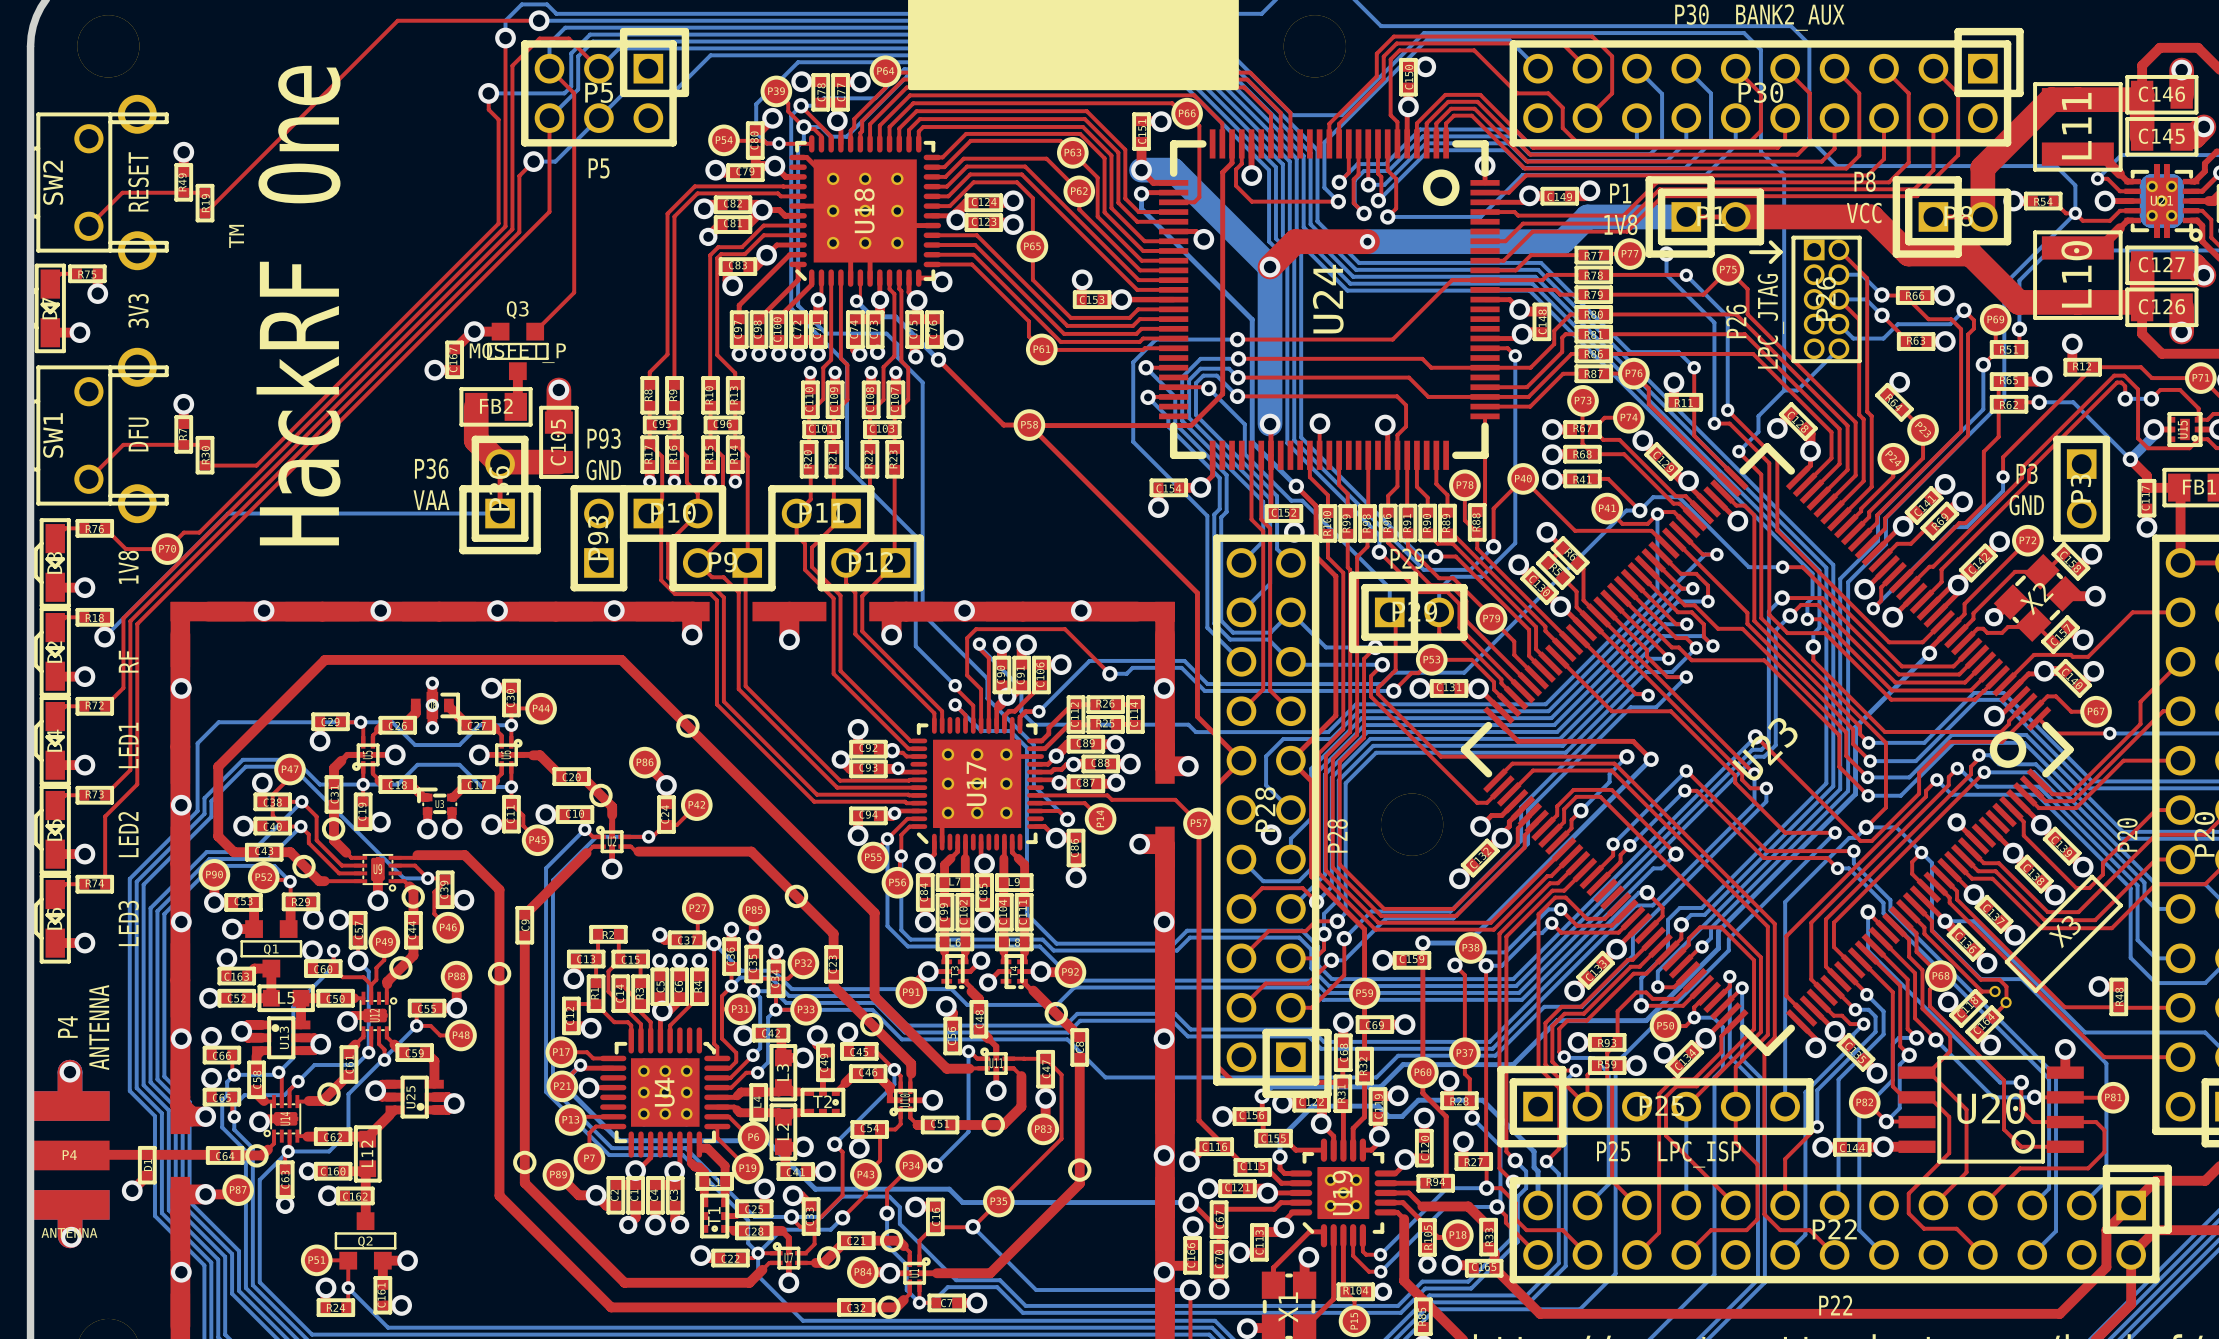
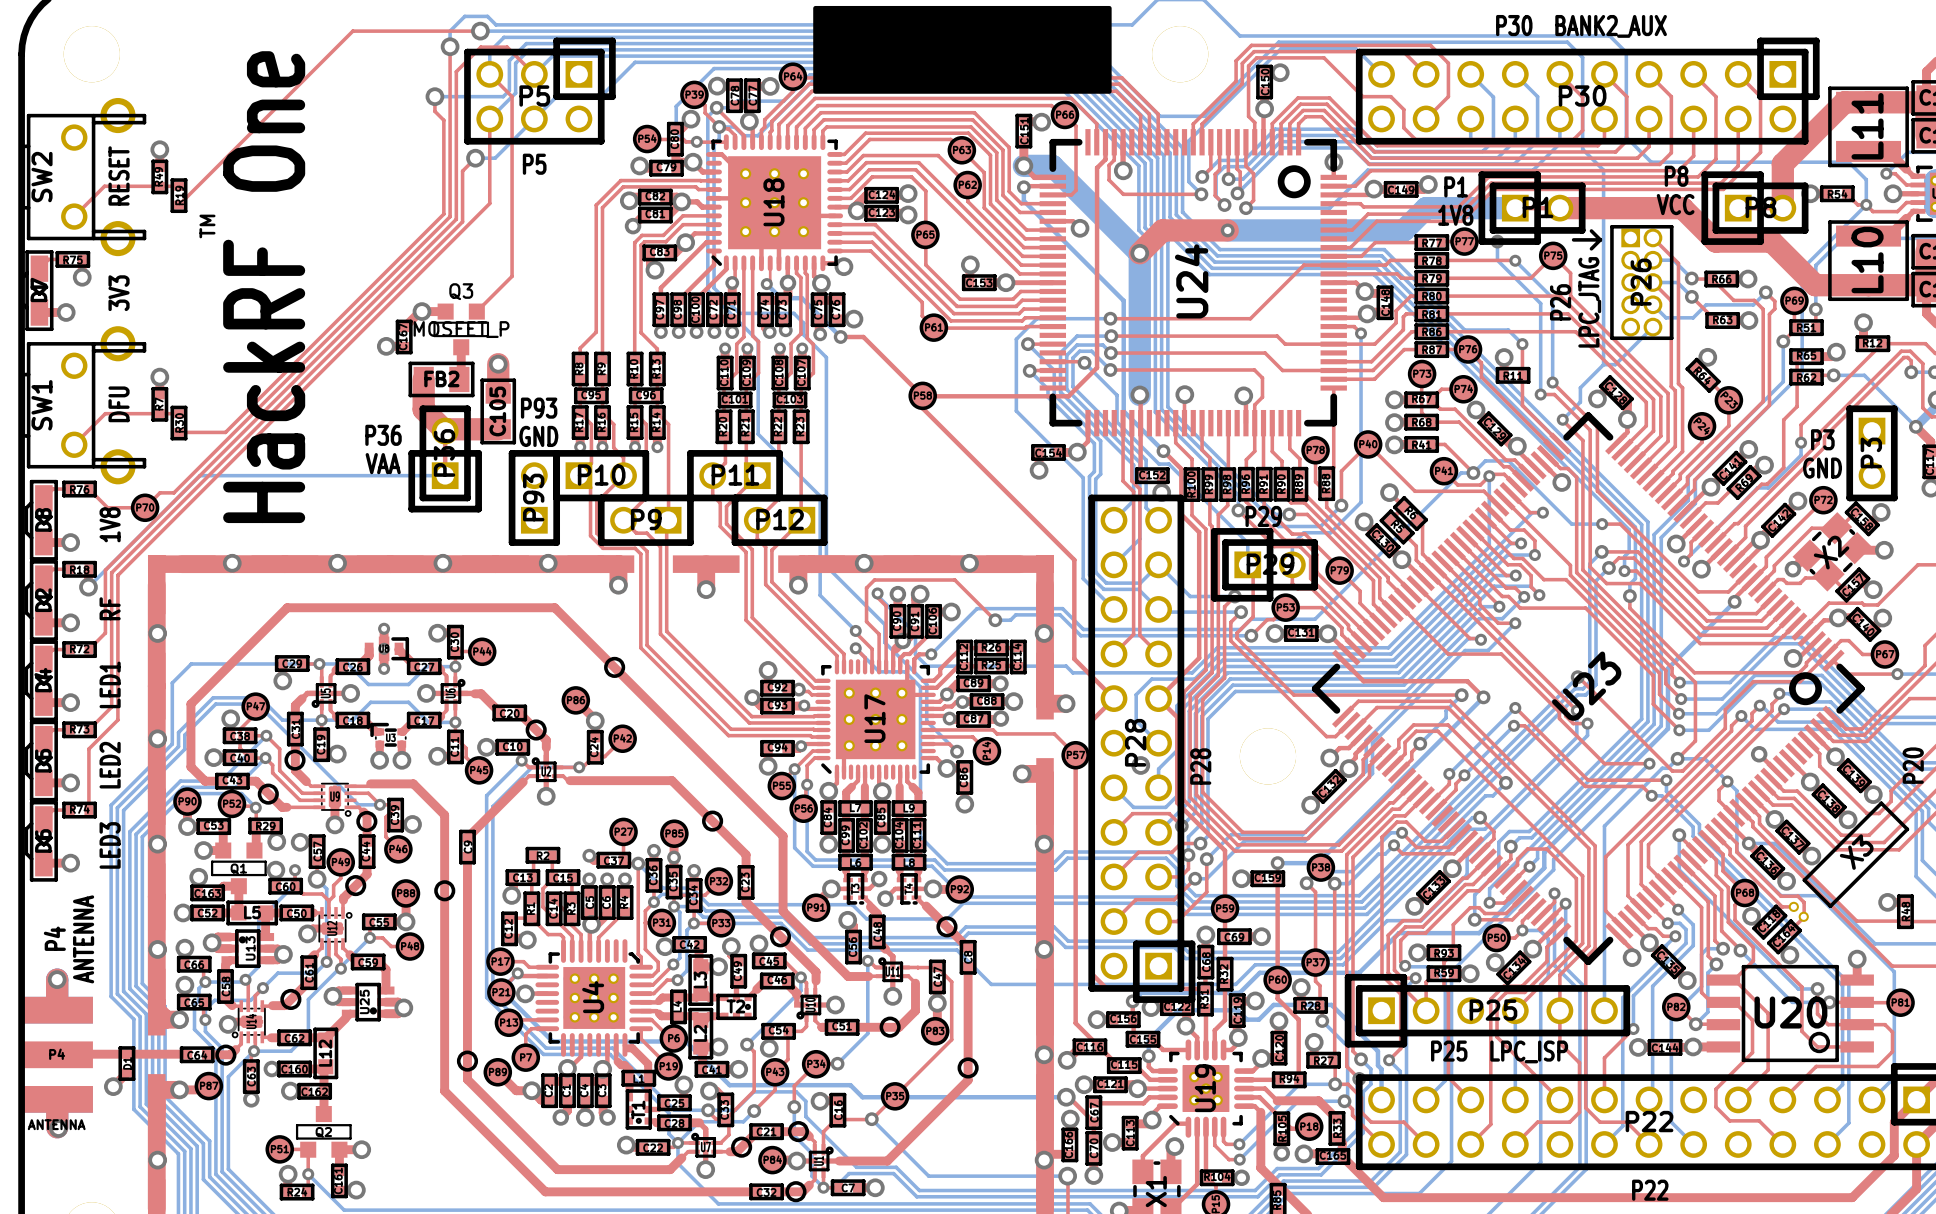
top track: (938, 359) (1003, 425) (1029, 425) (1197, 593) (1197, 606) -> (840, 337) (863, 337) (922, 396) (922, 408) (1074, 559)

